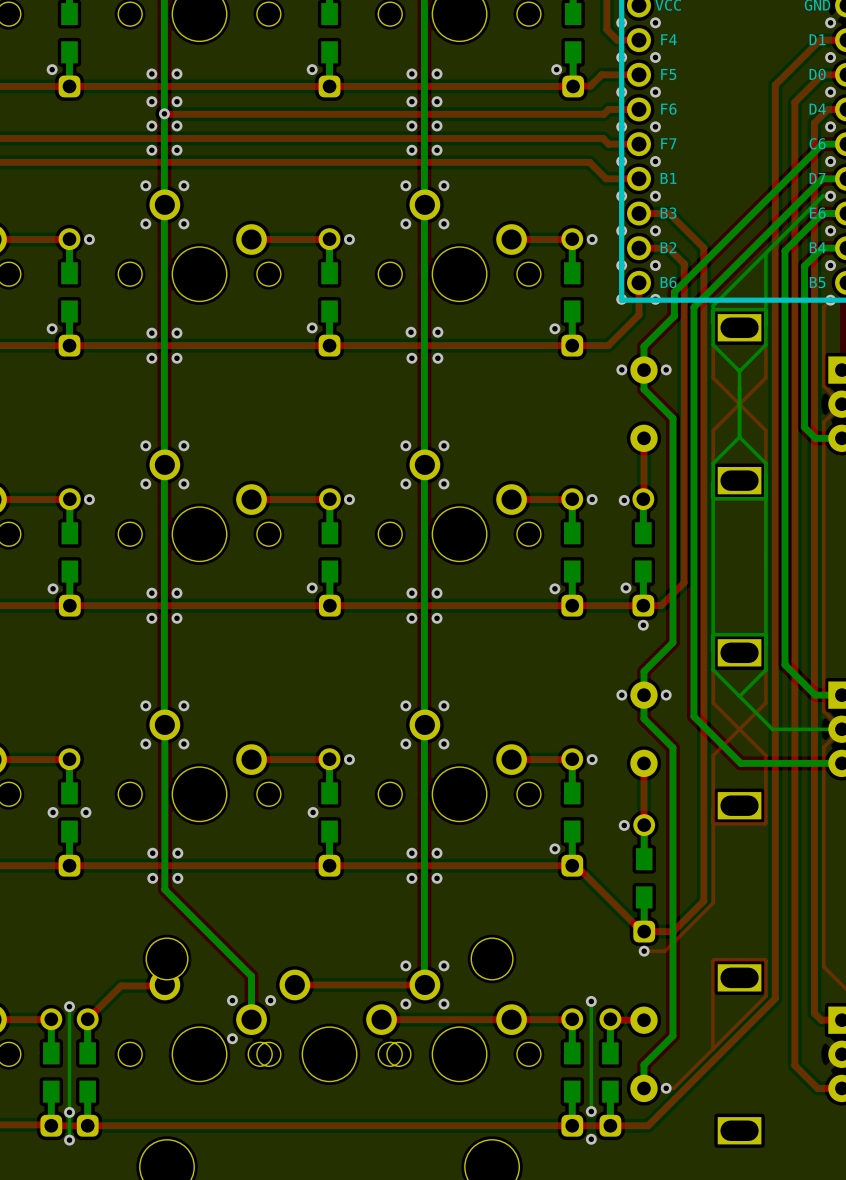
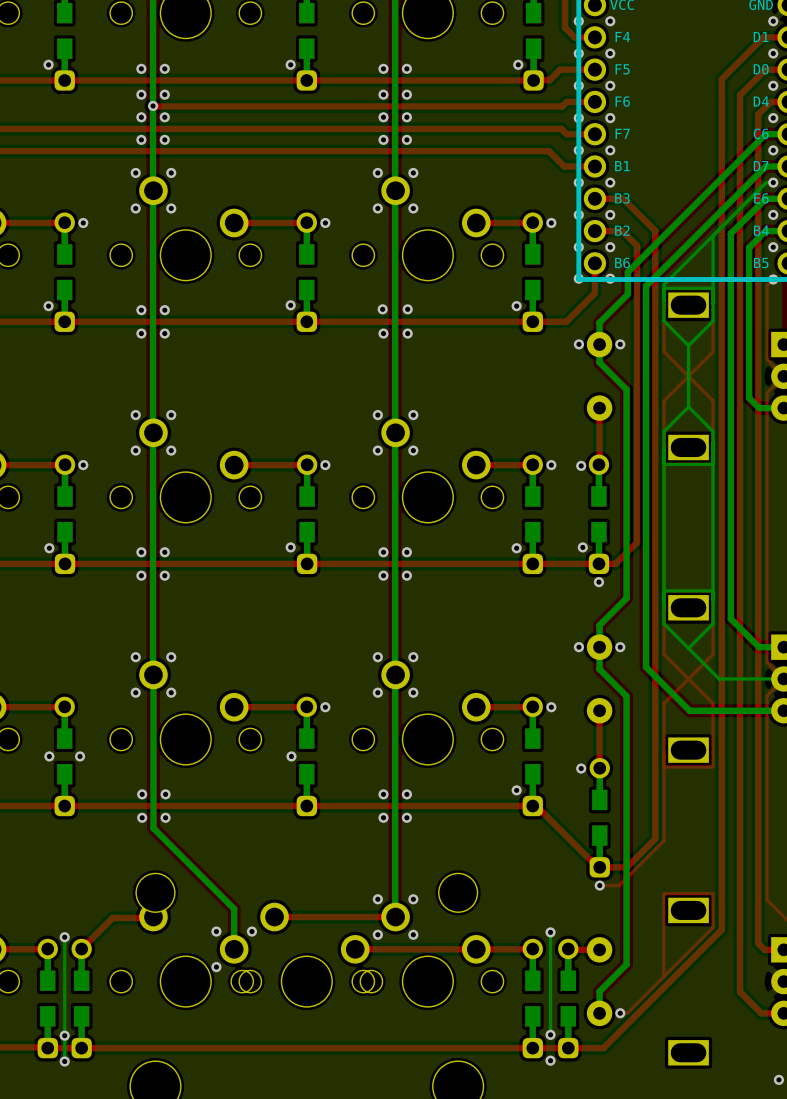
via: none -> (778, 1079)

